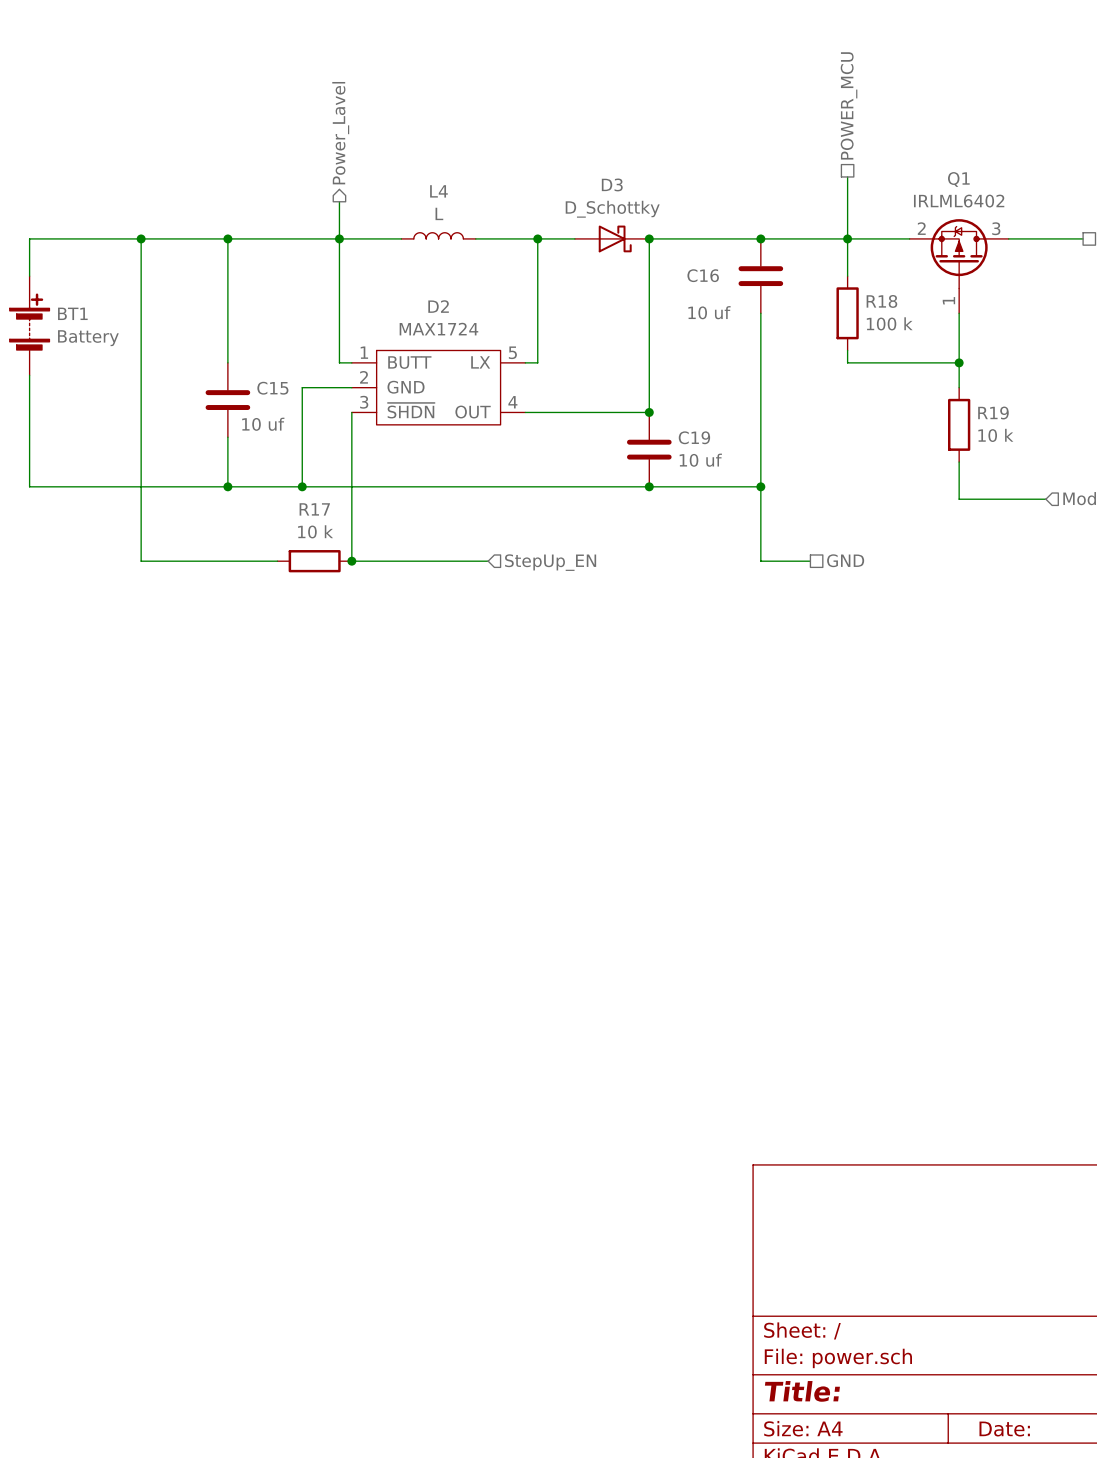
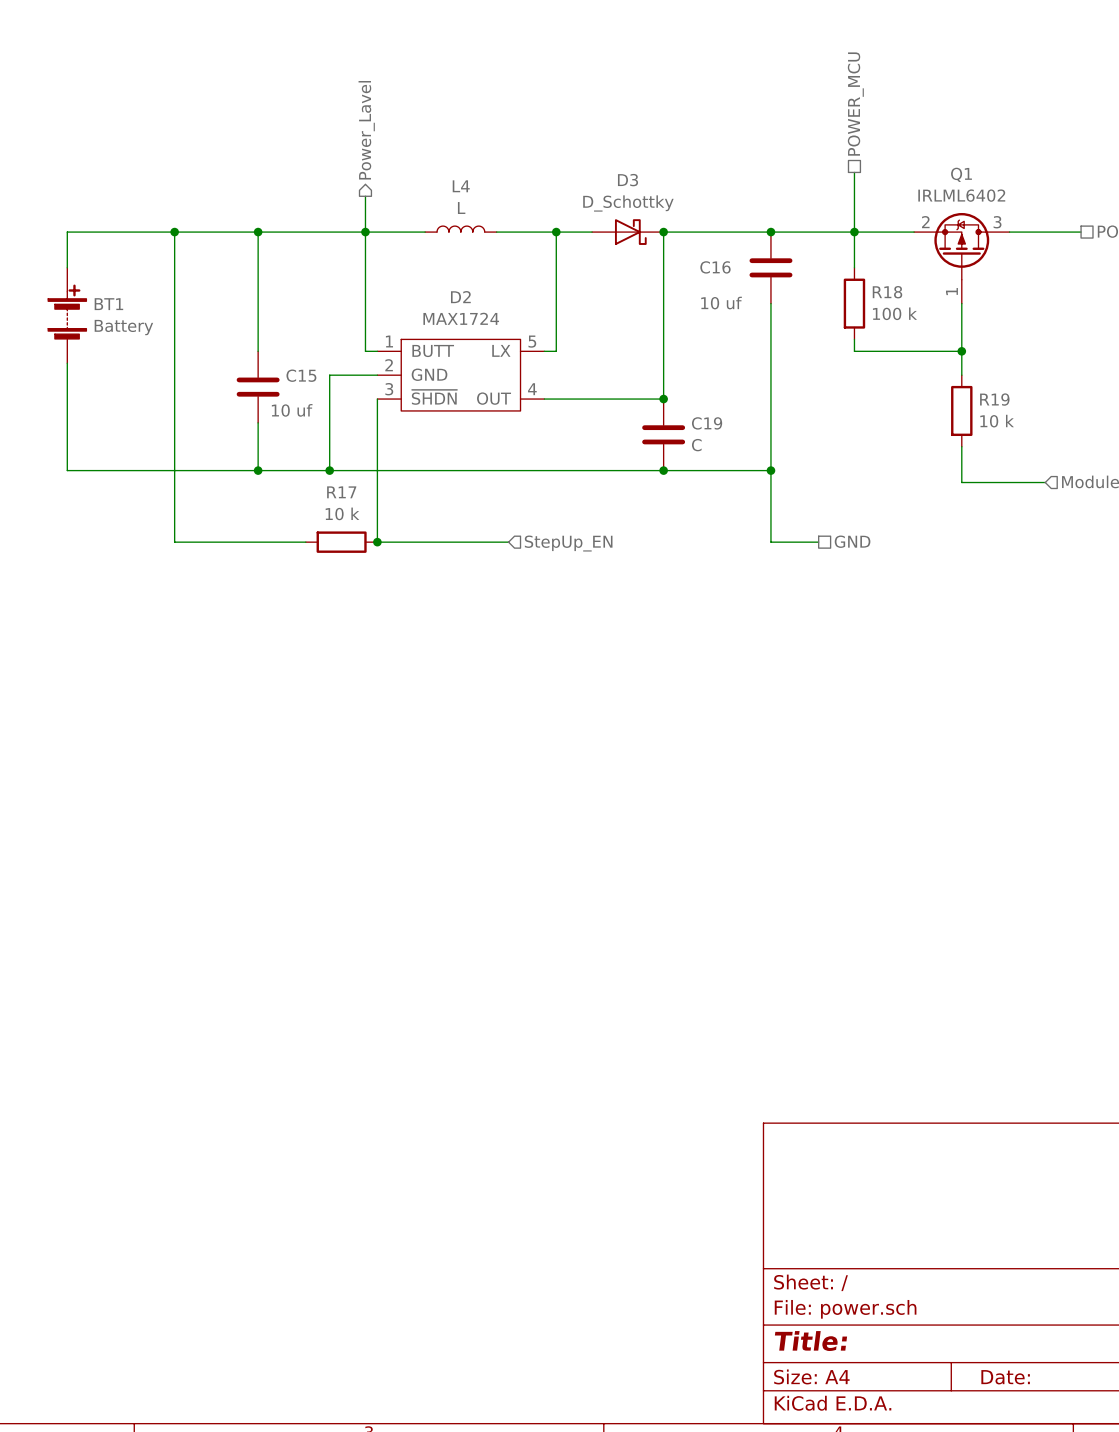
C19 value: 10 uf (700, 460) -> C (696, 445)

